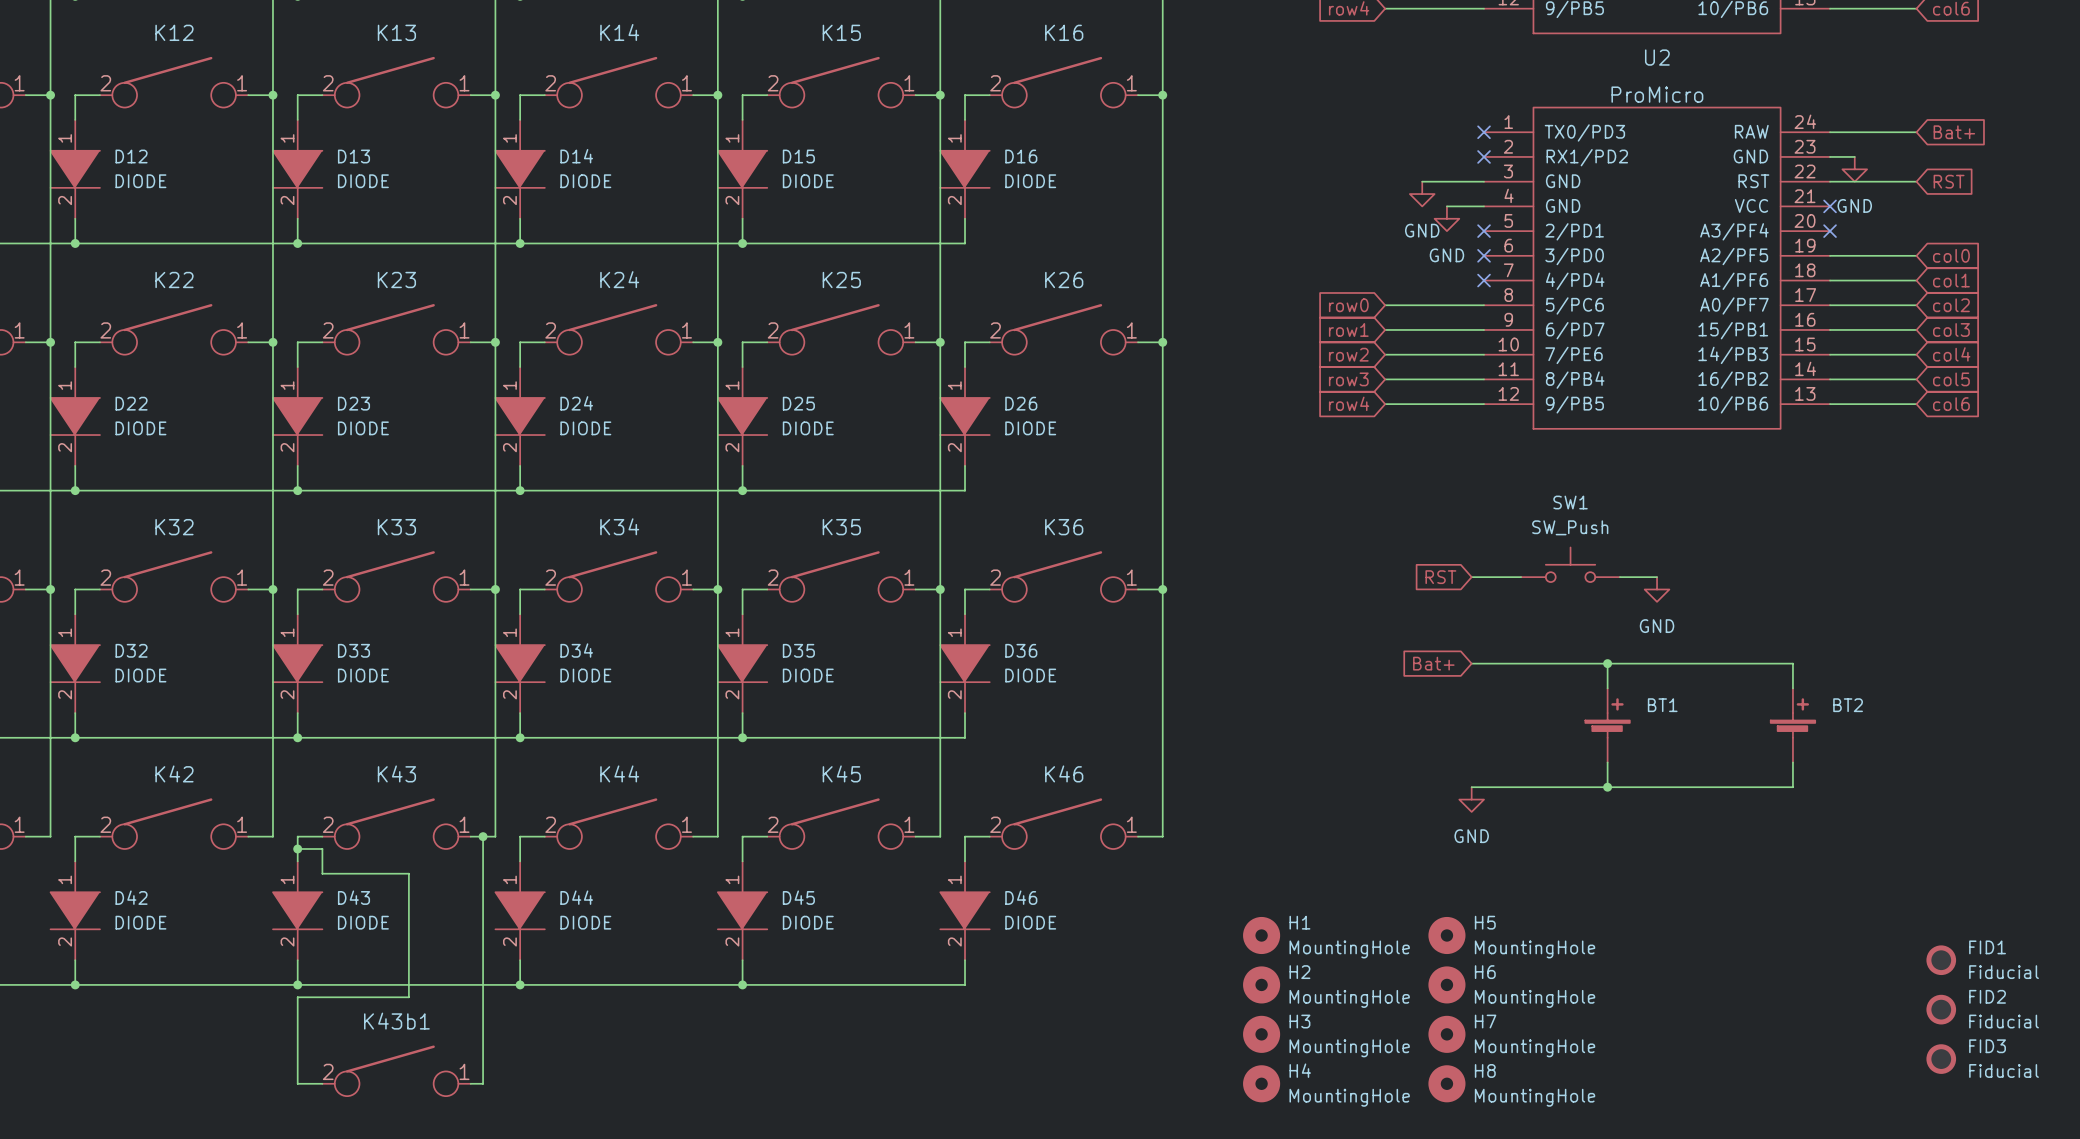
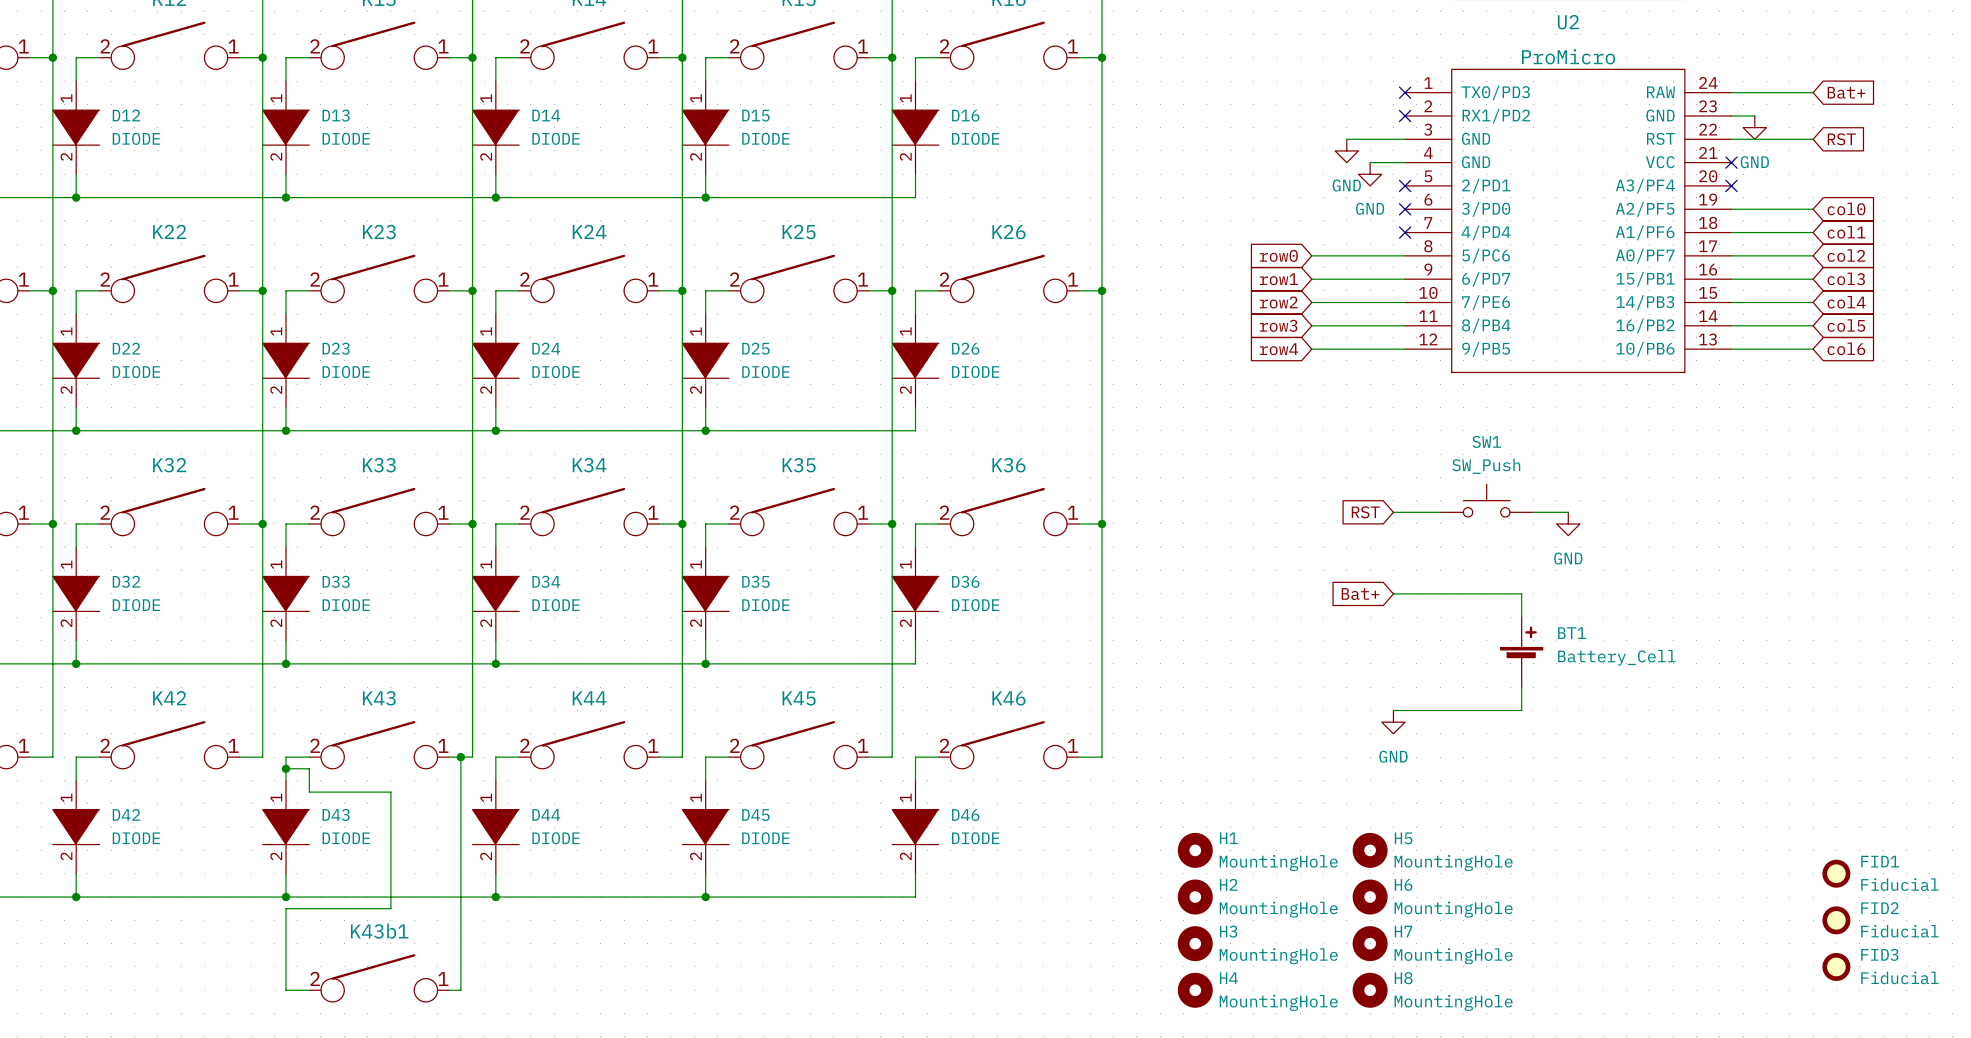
wire: (1607, 663) (1792, 663) (1792, 688) -> none
junction: (1607, 663) -> none
BT2: (1792, 725) -> none
BT1 value: none -> Battery_Cell (1616, 657)
wire: (1792, 762) (1792, 787) (1607, 787) -> none
junction: (1607, 787) -> none

